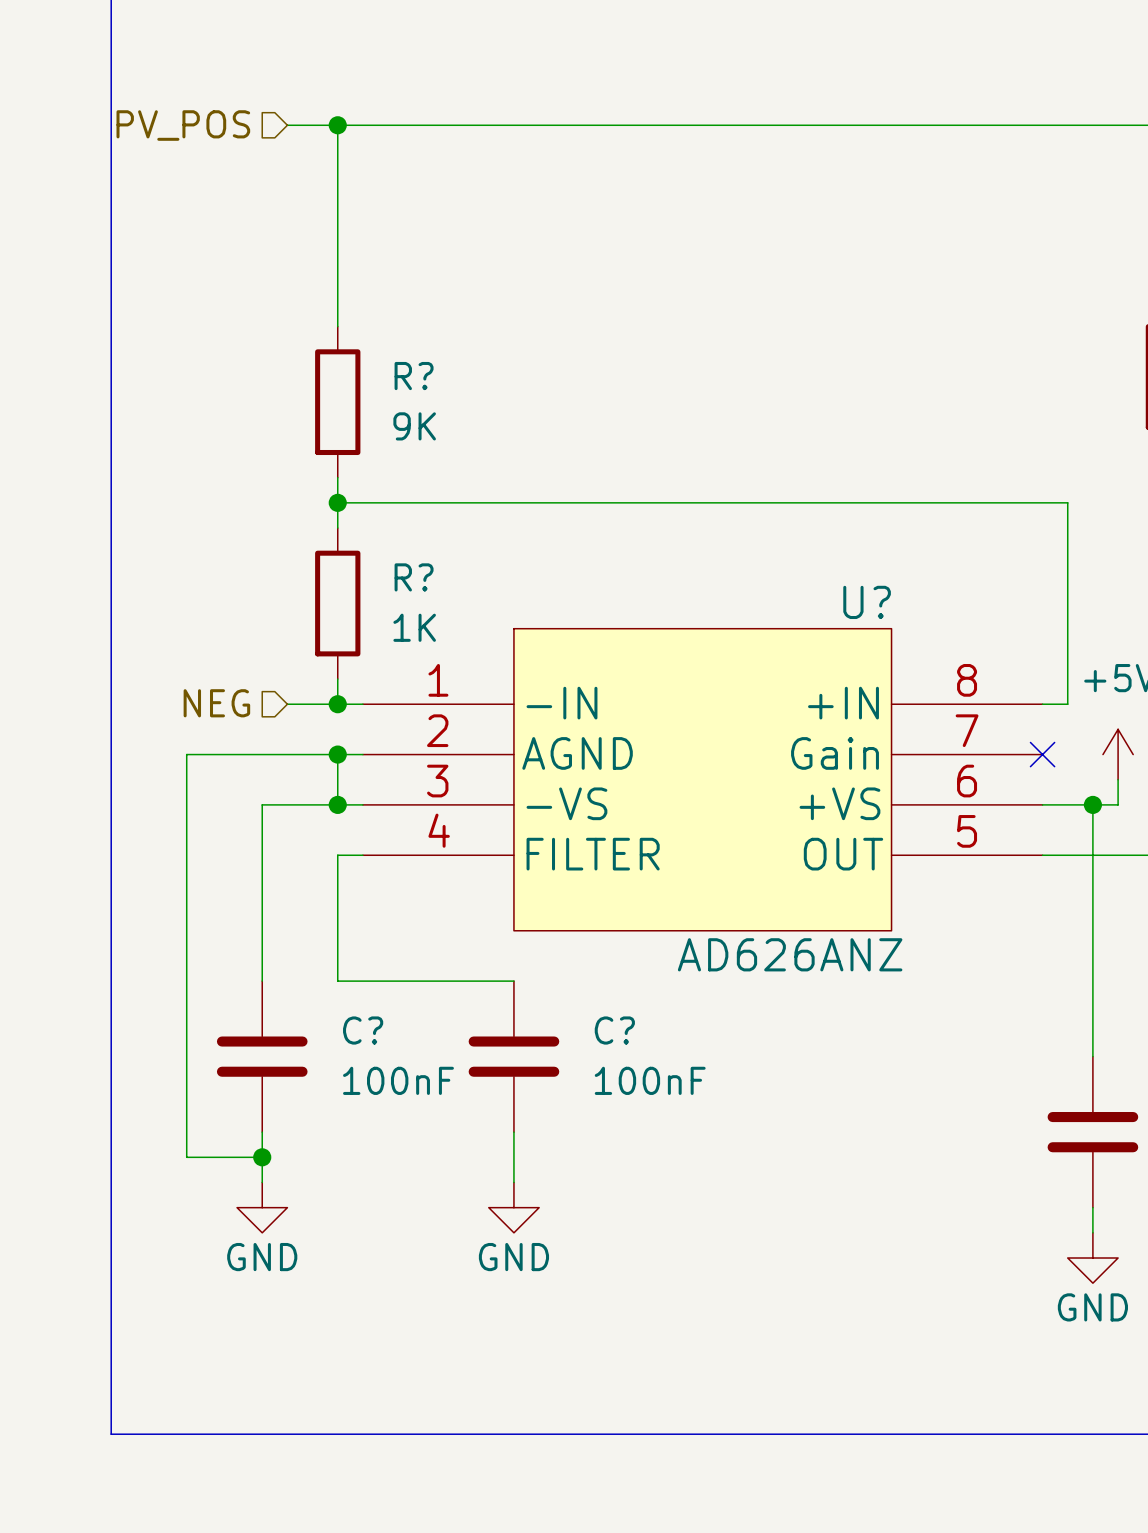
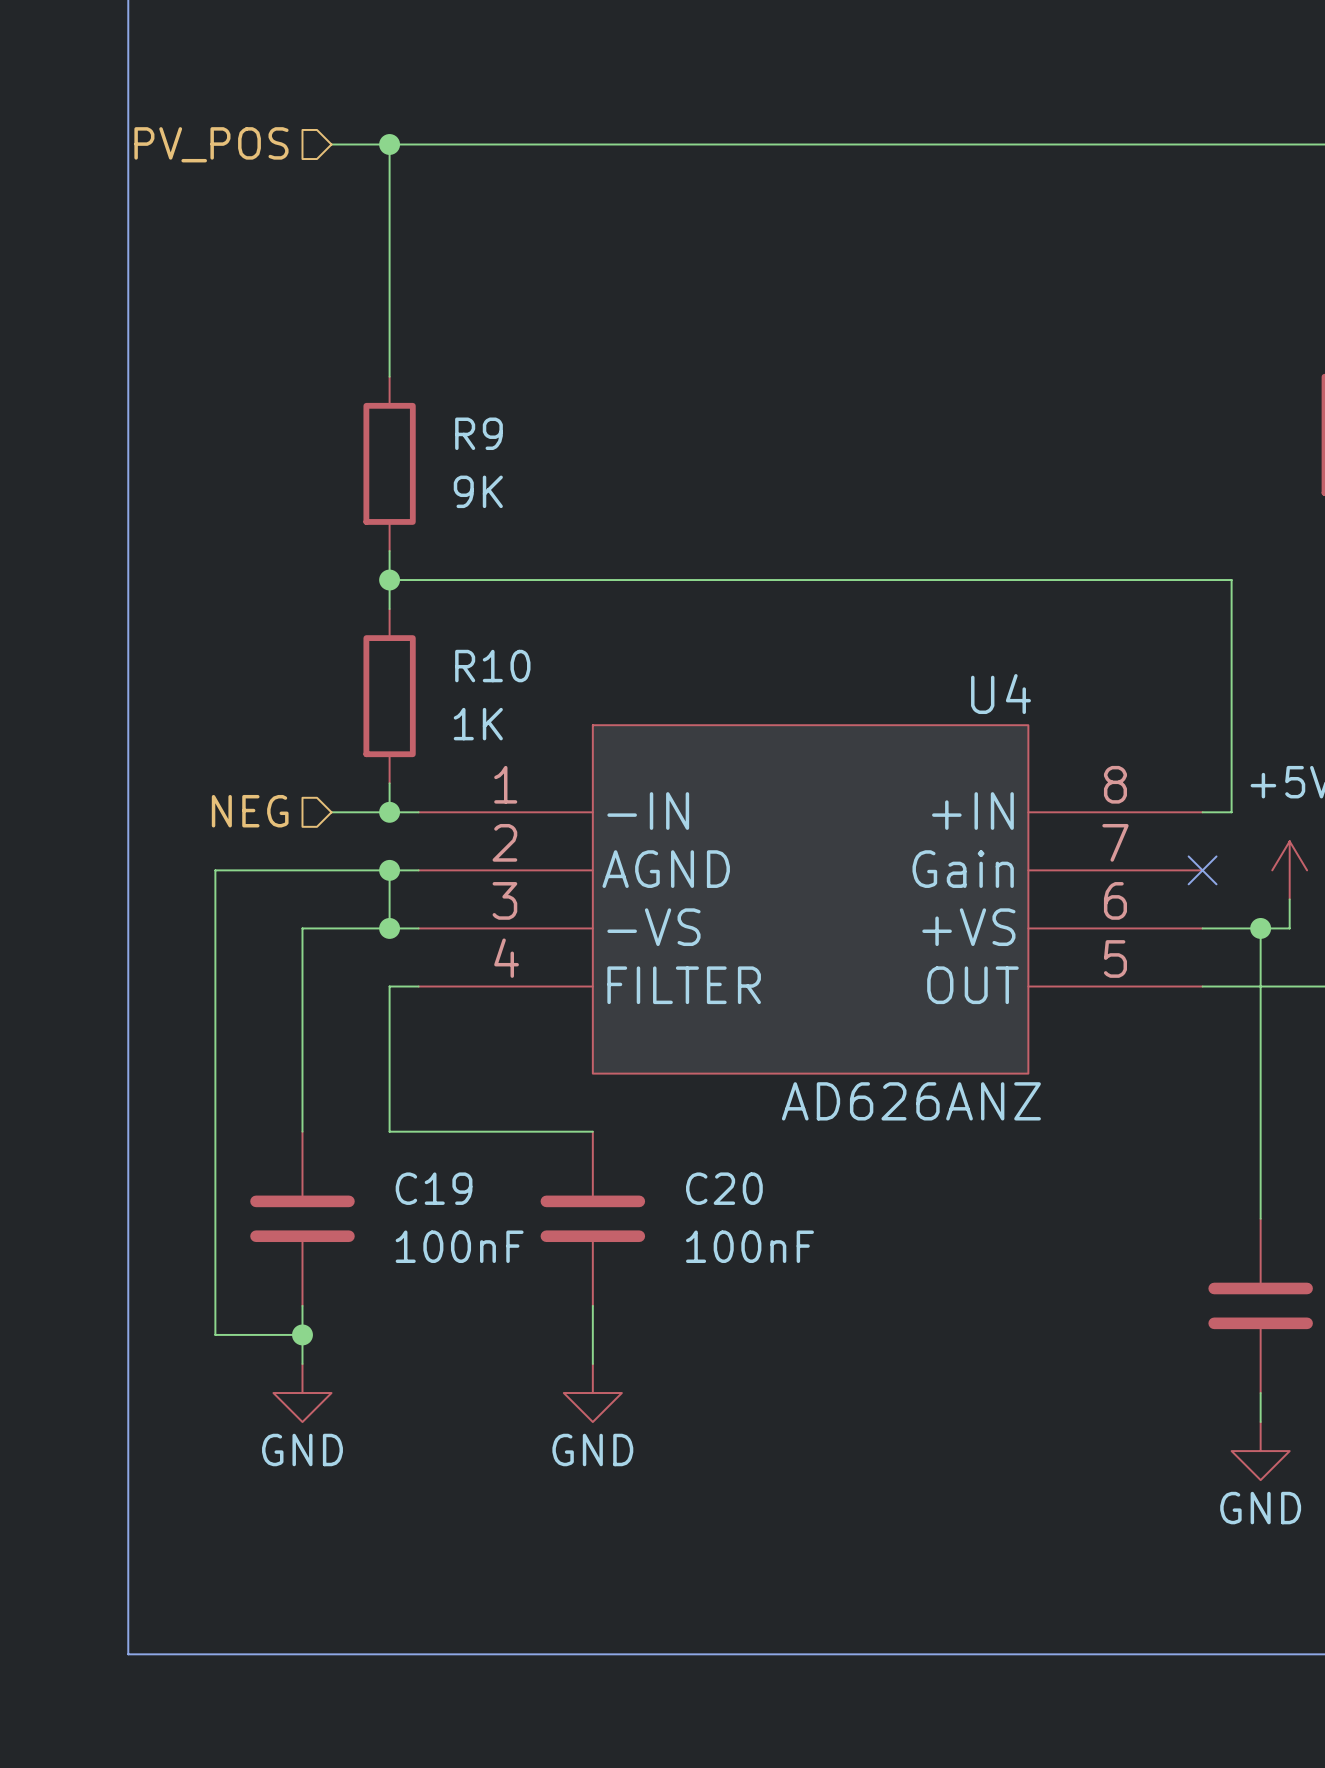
R? name: R? (414, 376) -> R9 (478, 433)
R? name: R? (414, 577) -> R10 (492, 666)
U? name: U? (867, 602) -> U4 (1000, 694)
C? name: C? (363, 1030) -> C19 (434, 1188)
C? name: C? (614, 1030) -> C20 (724, 1188)

